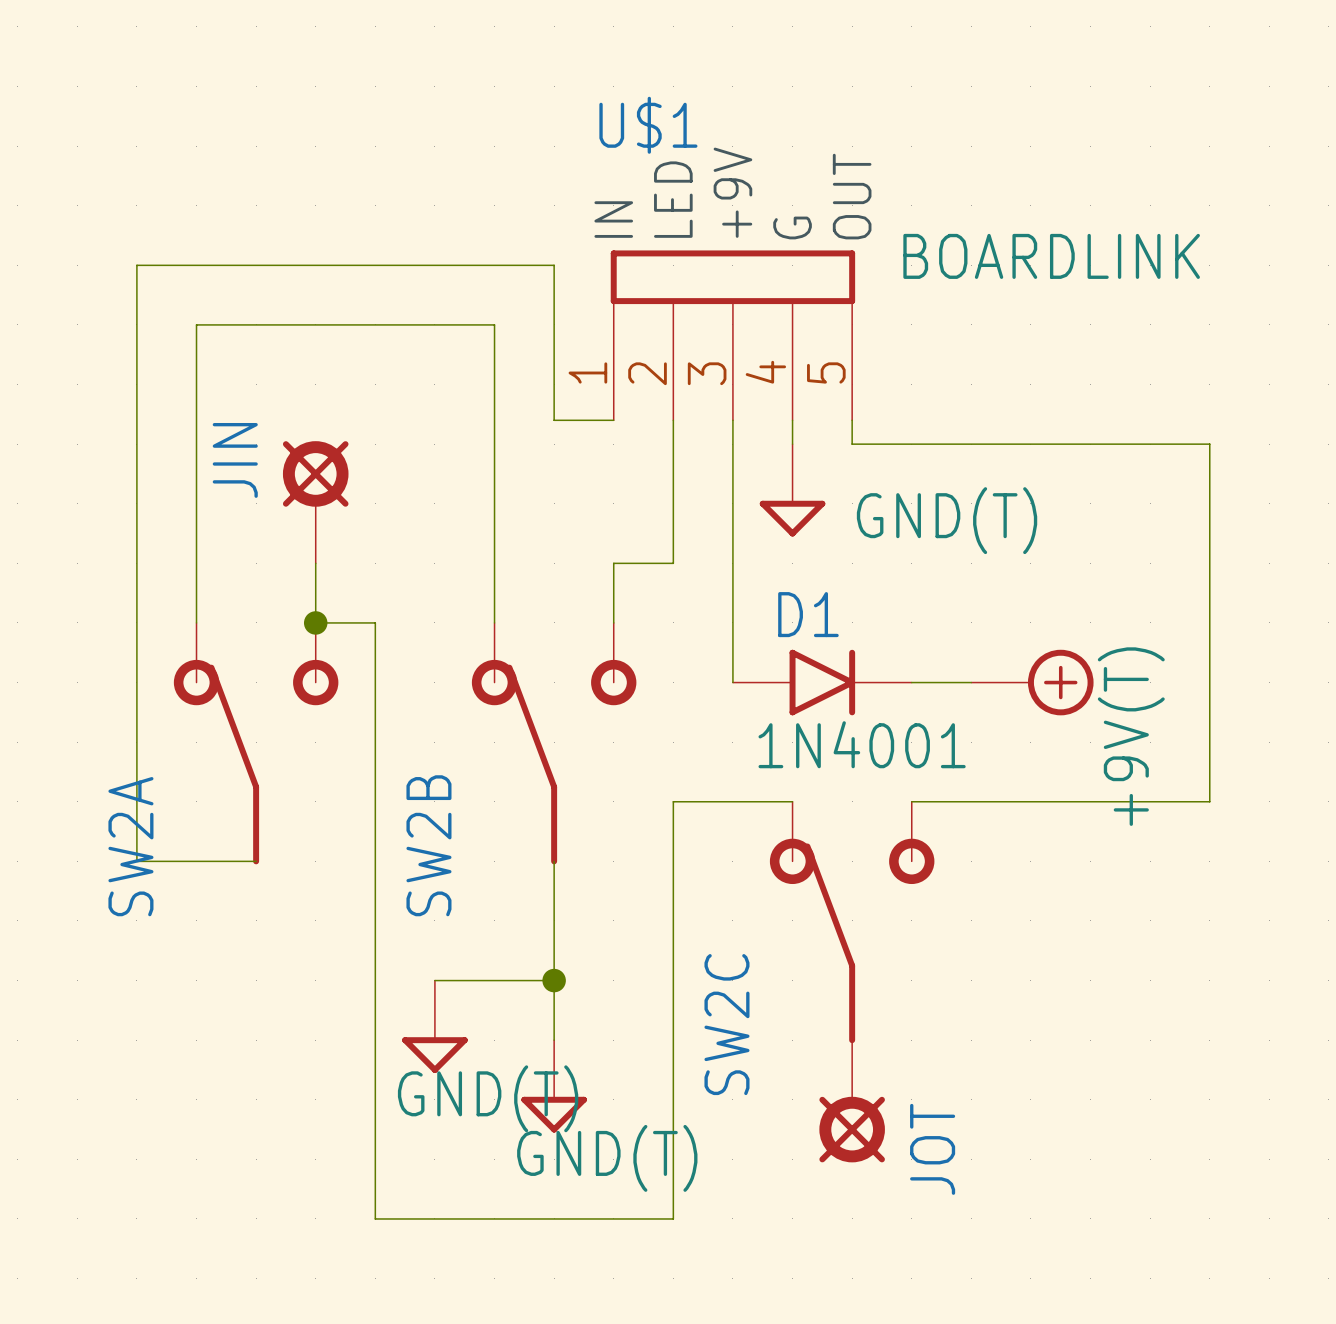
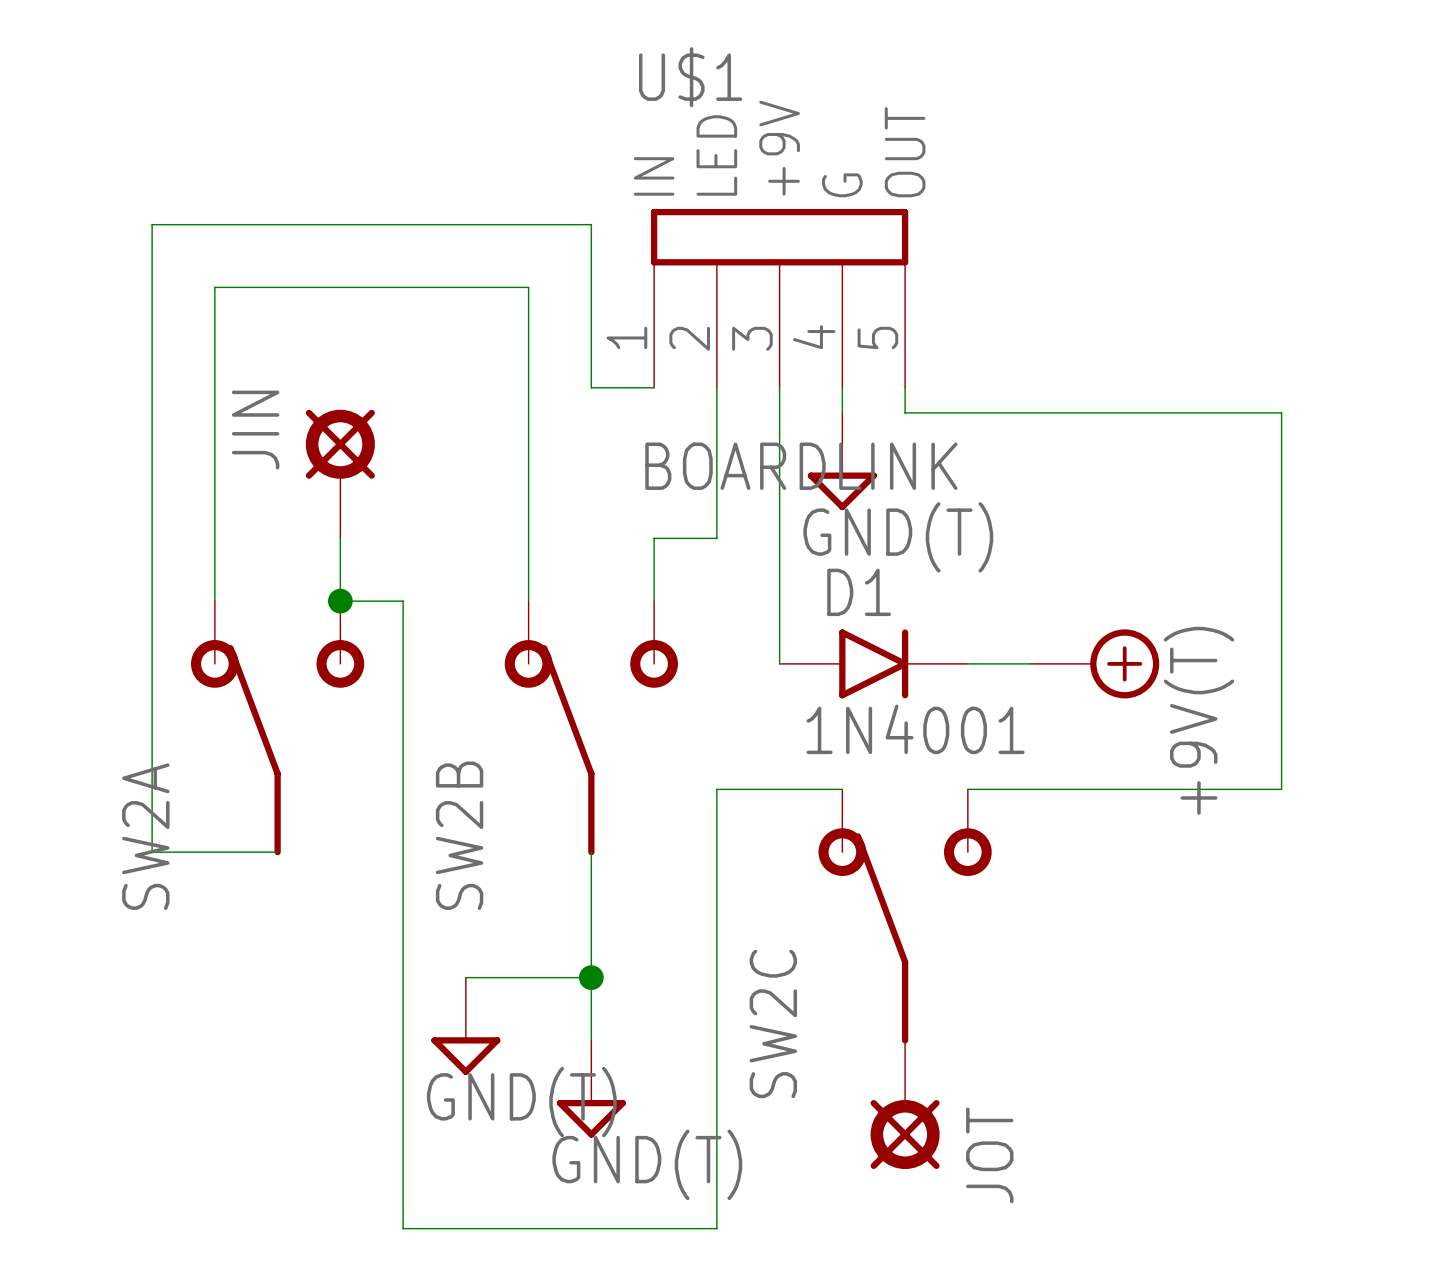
U$1 value position: BOARDLINK (1051, 256) -> BOARDLINK (801, 466)
part value position: GND(T) (947, 520) -> GND(T) (898, 537)

